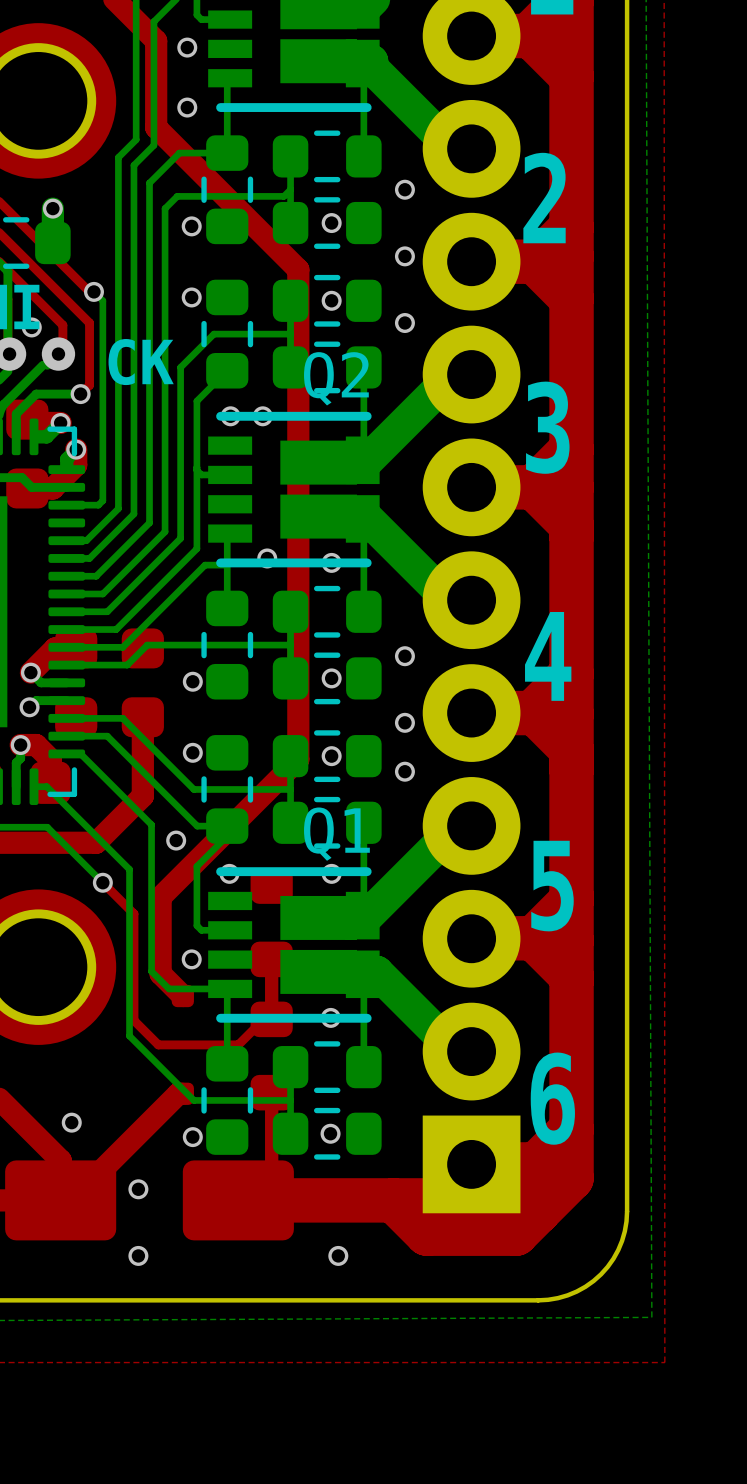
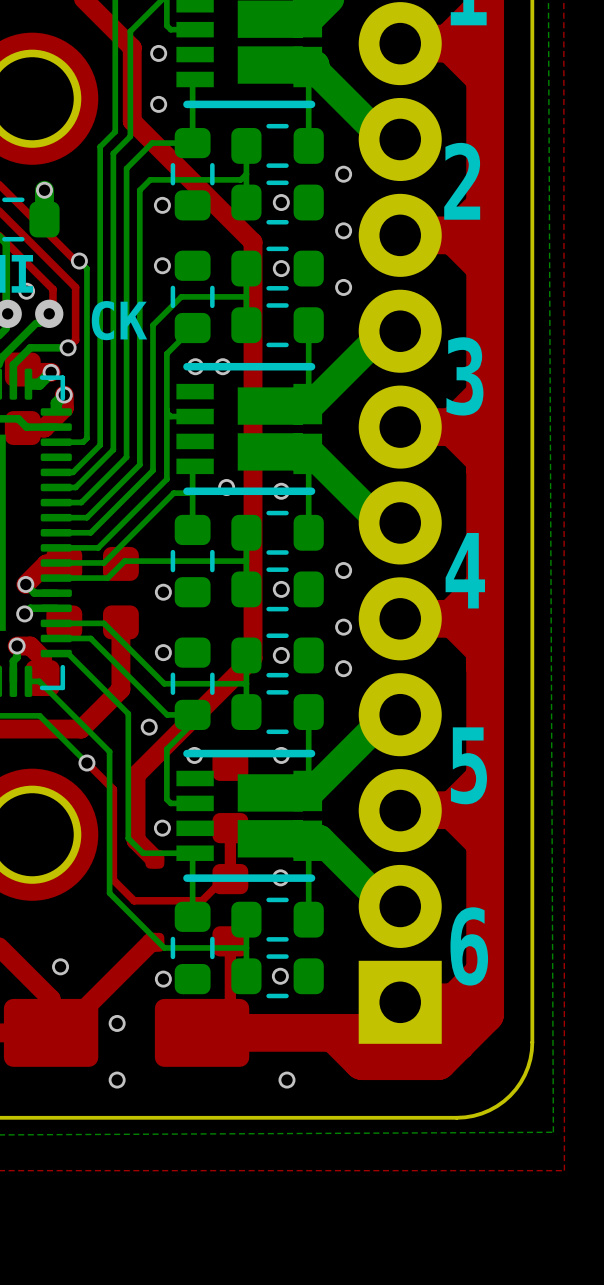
Q2 name: Q2 (336, 378) -> none
Q1 name: Q1 (336, 834) -> none

